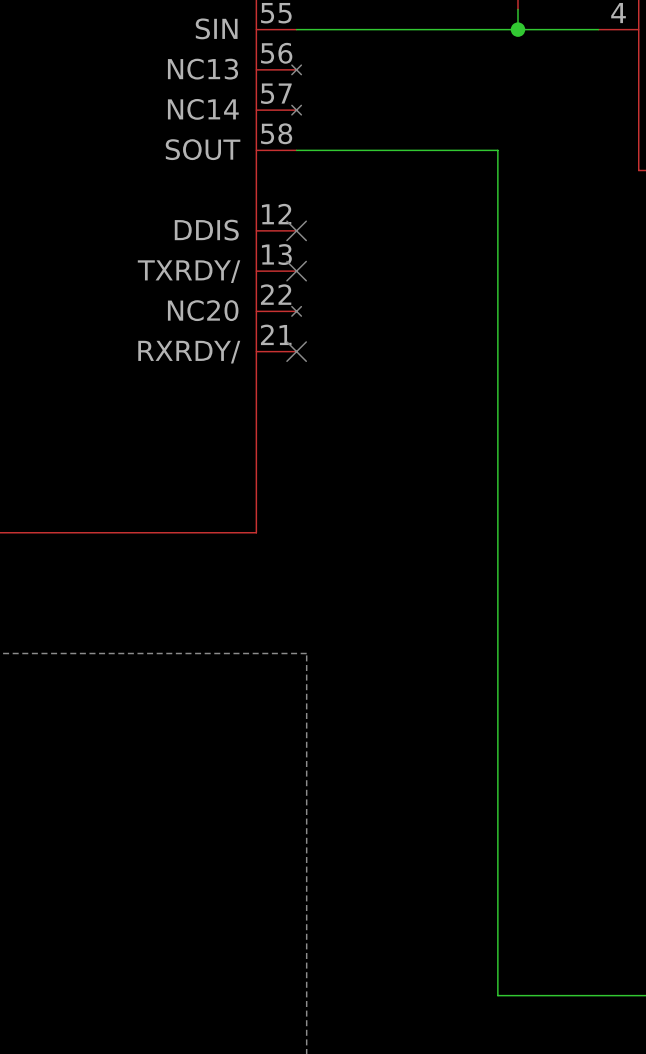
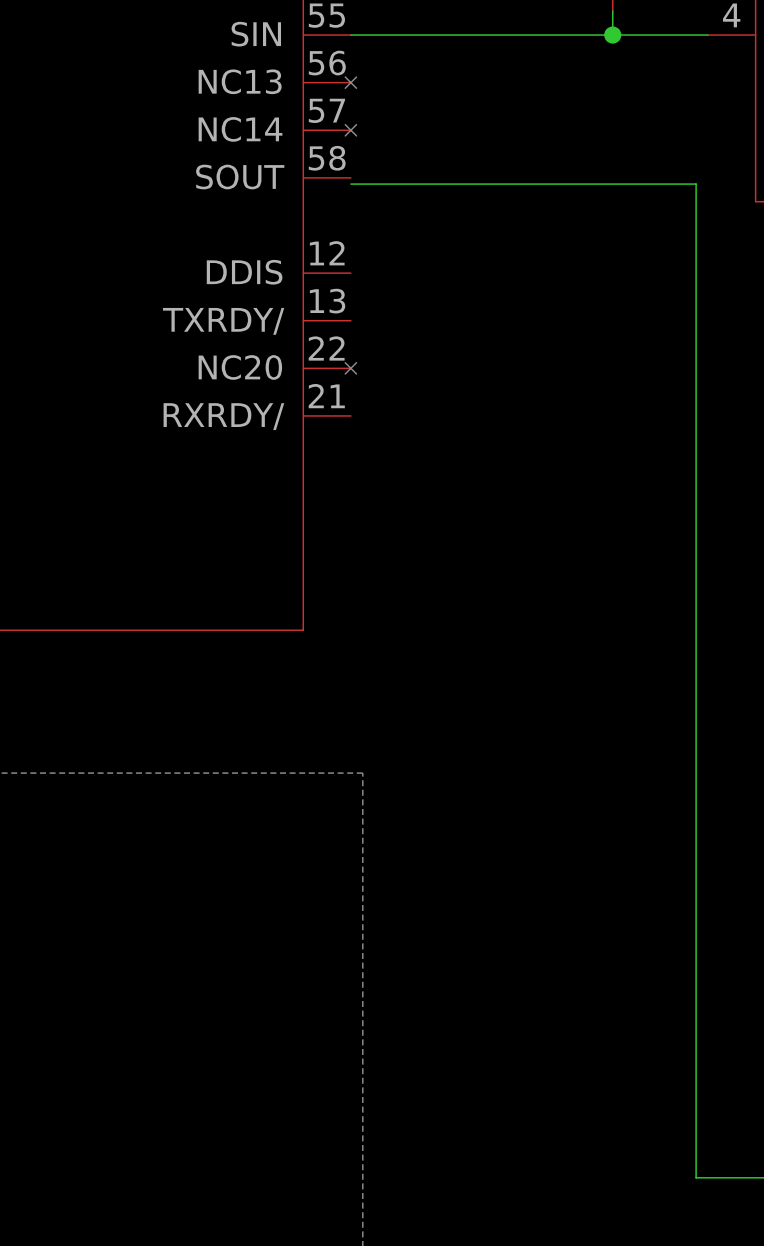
wire: (296, 150) (497, 150) (497, 995) (588, 995) -> (350, 184) (696, 184) (696, 1177)
no-connect mark: (296, 230) -> none
no-connect mark: (296, 271) -> none
no-connect mark: (296, 351) -> none

